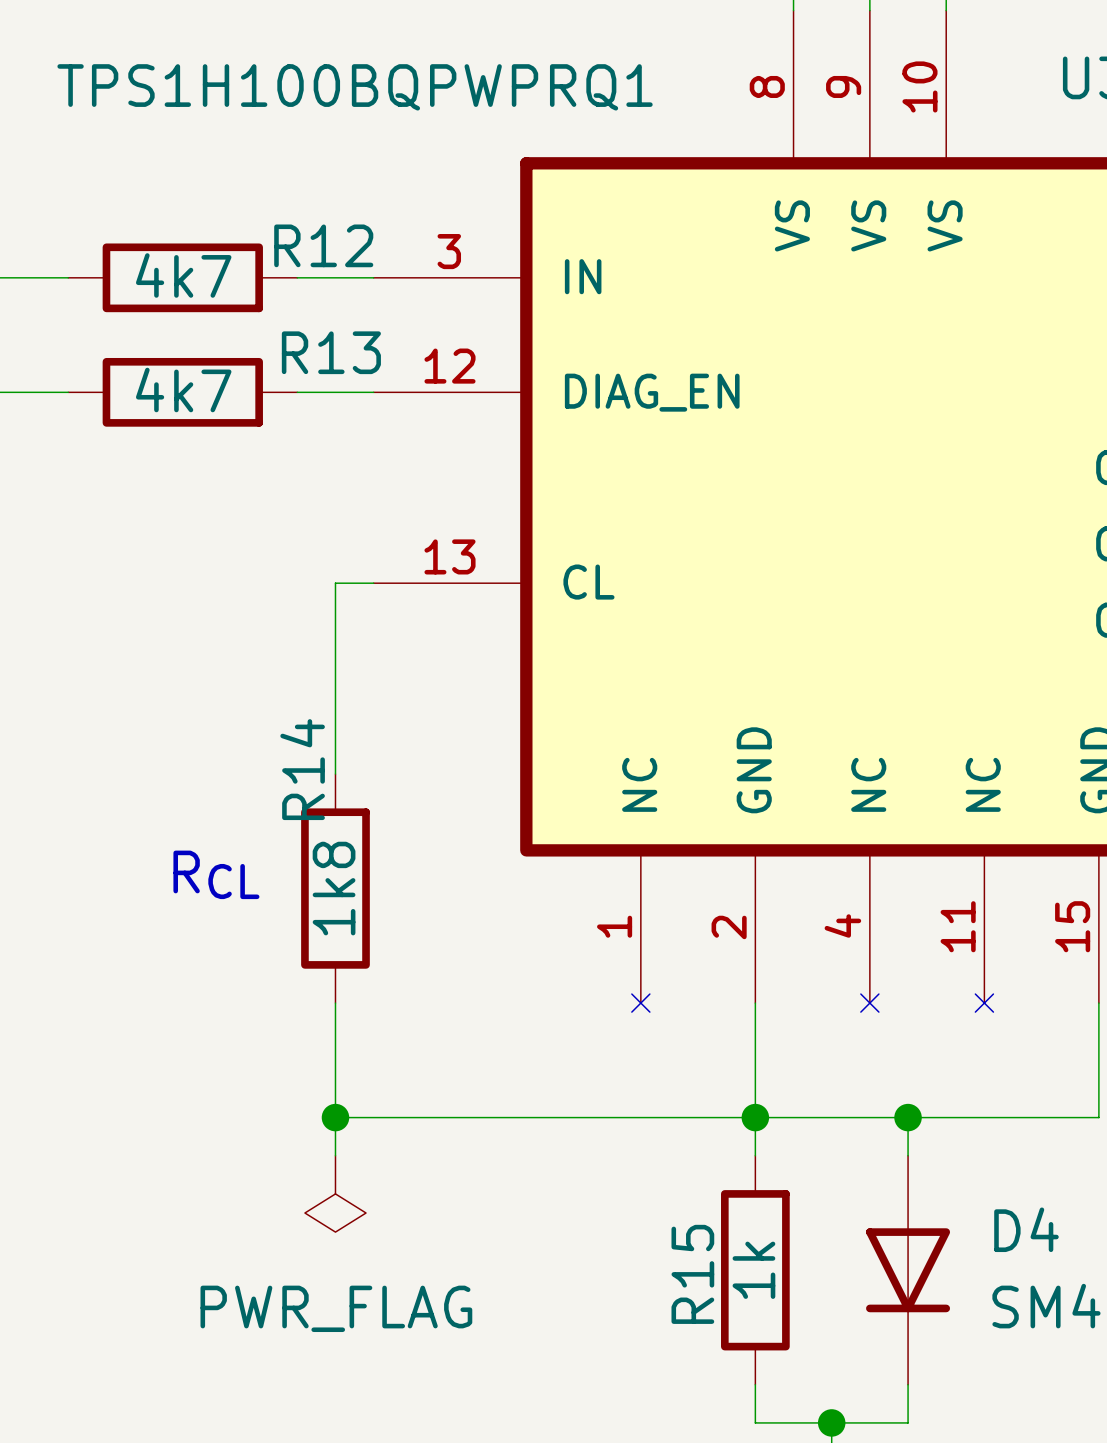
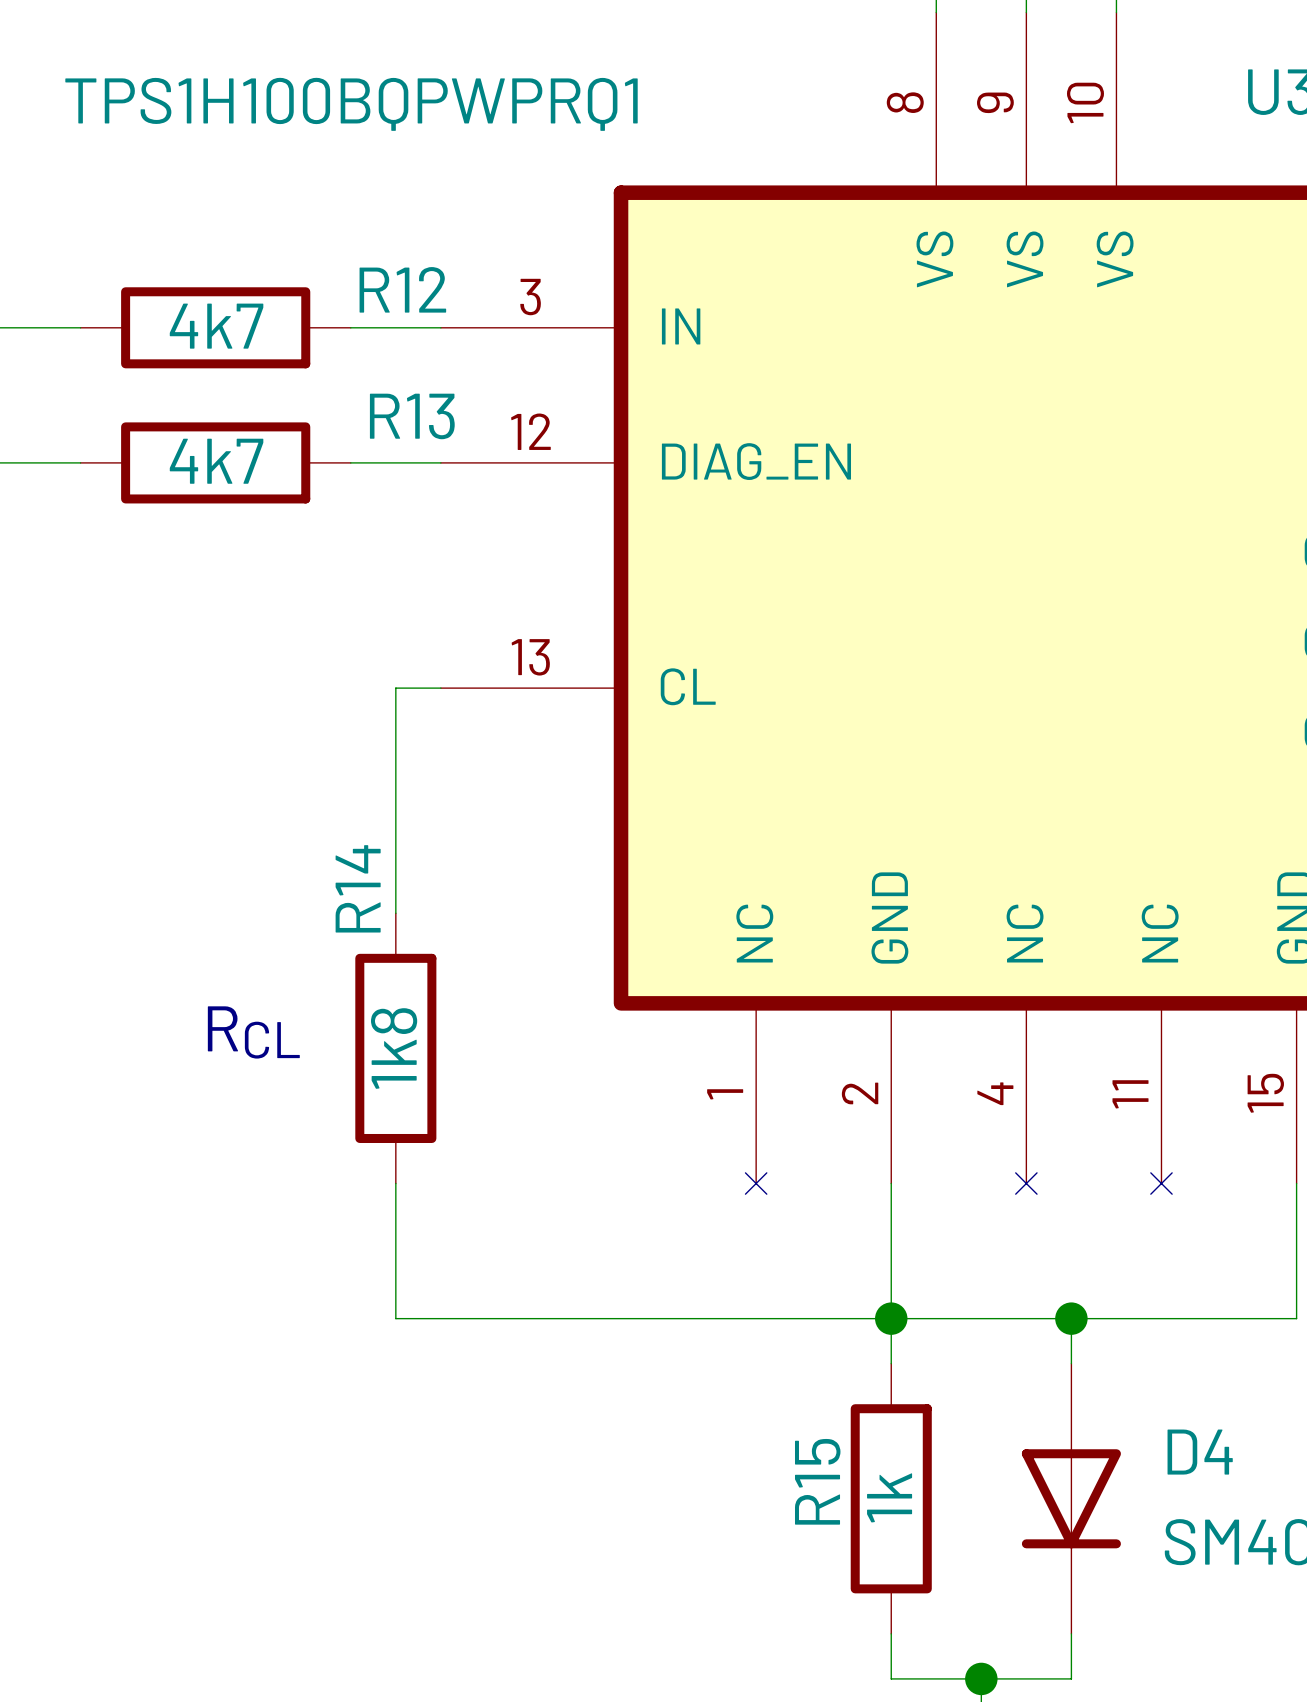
wire: (335, 1117) (335, 1155) -> none
junction: (335, 1117) -> none
power symbol: PWR_FLAG (335, 1193) -> none

